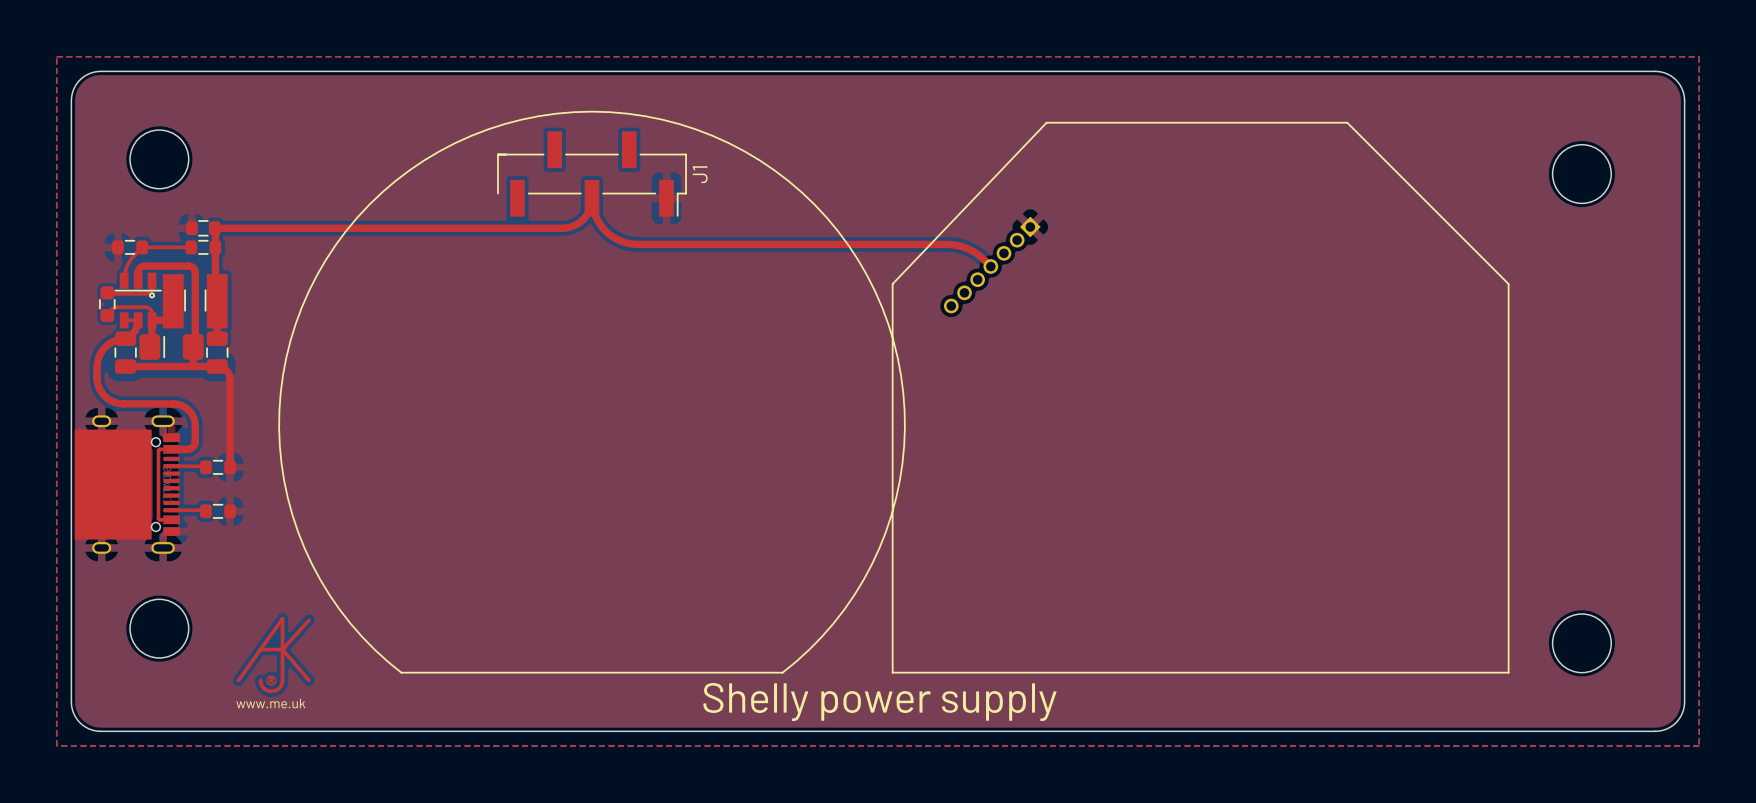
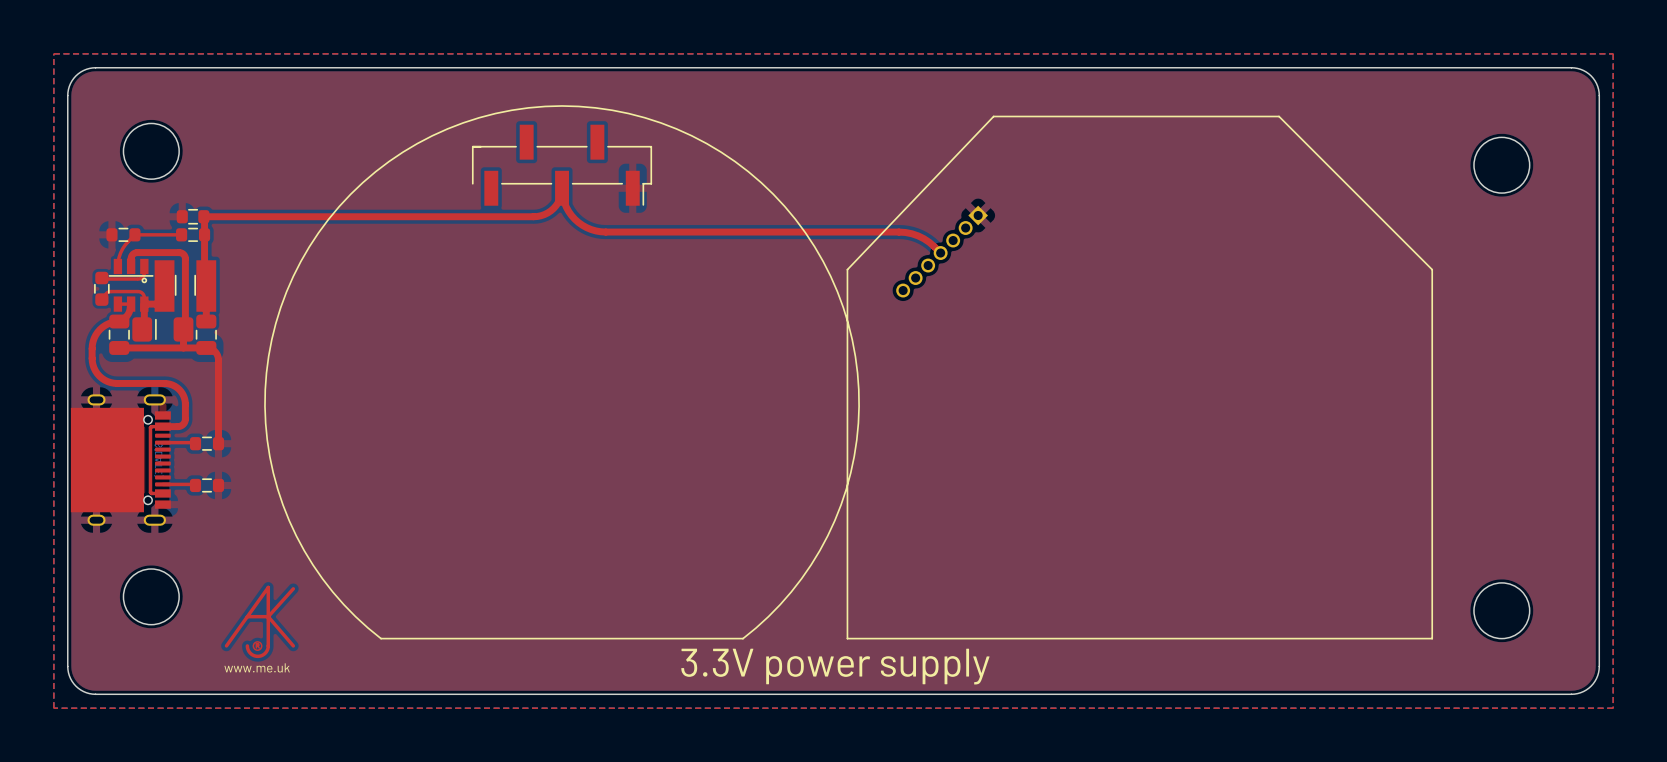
J1 name: J1 (700, 174) -> none
text: Shelly power supply (880, 701) -> 3.3V power supply (835, 666)

